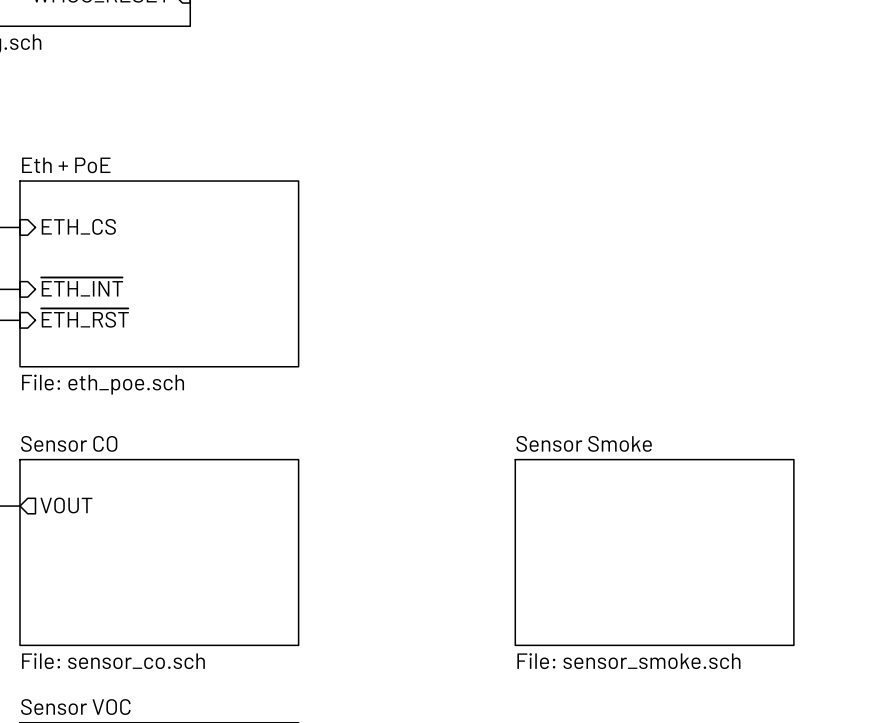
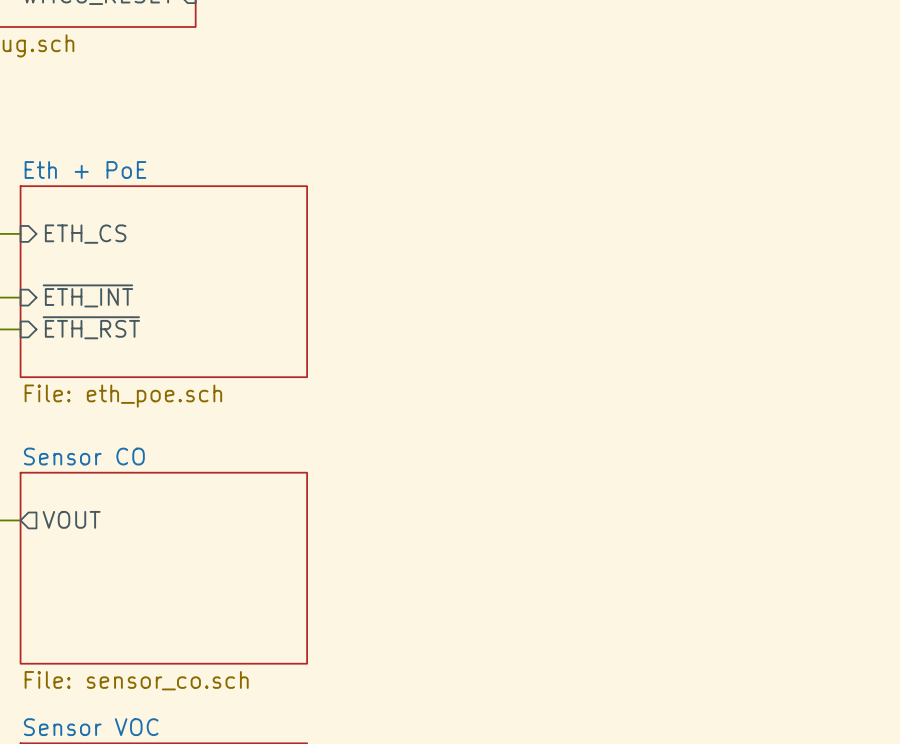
sheet Sensor Smoke: File: sensor_smoke.sch (654, 552) -> none

